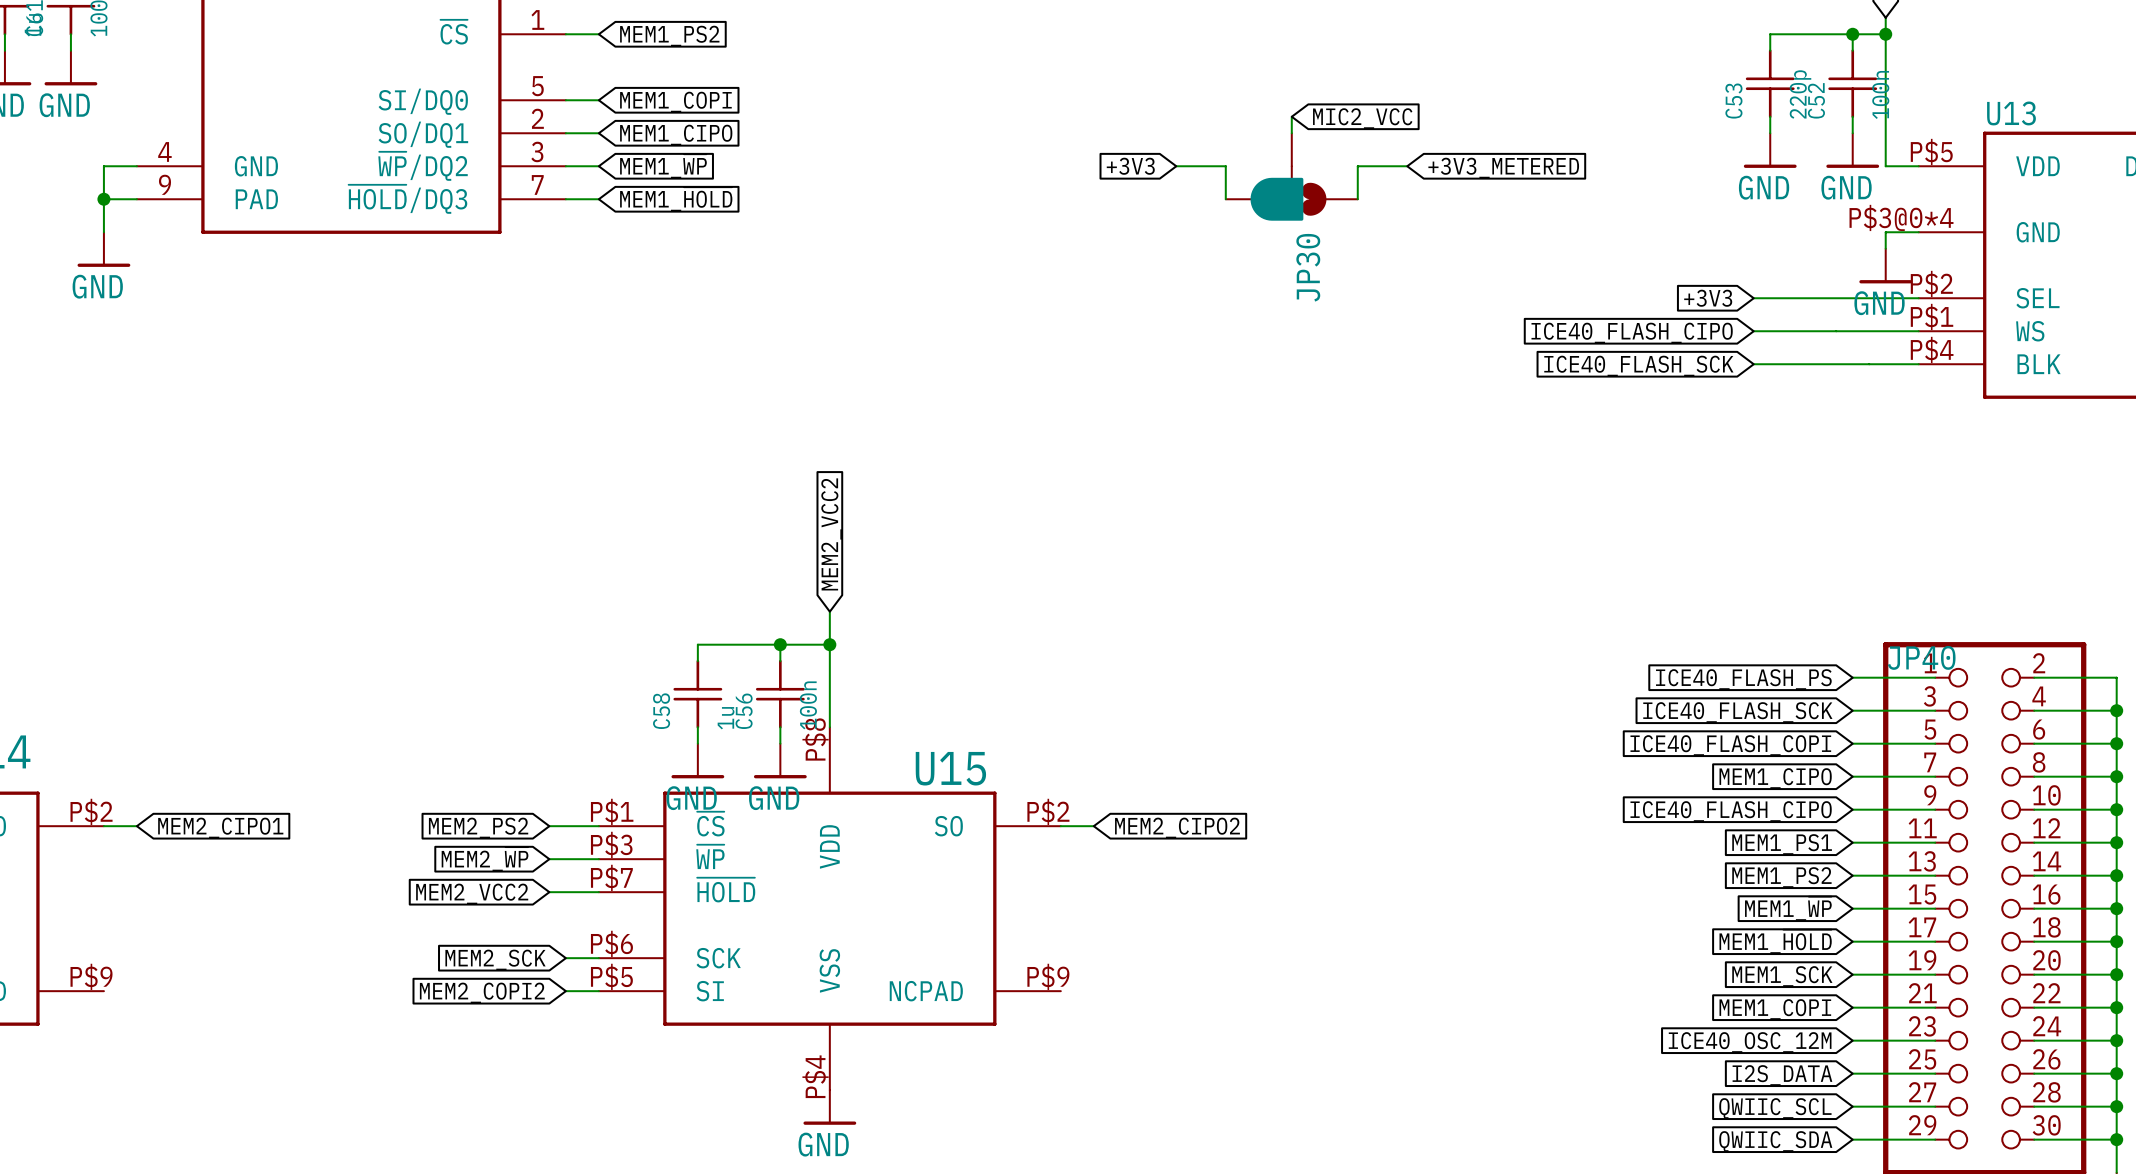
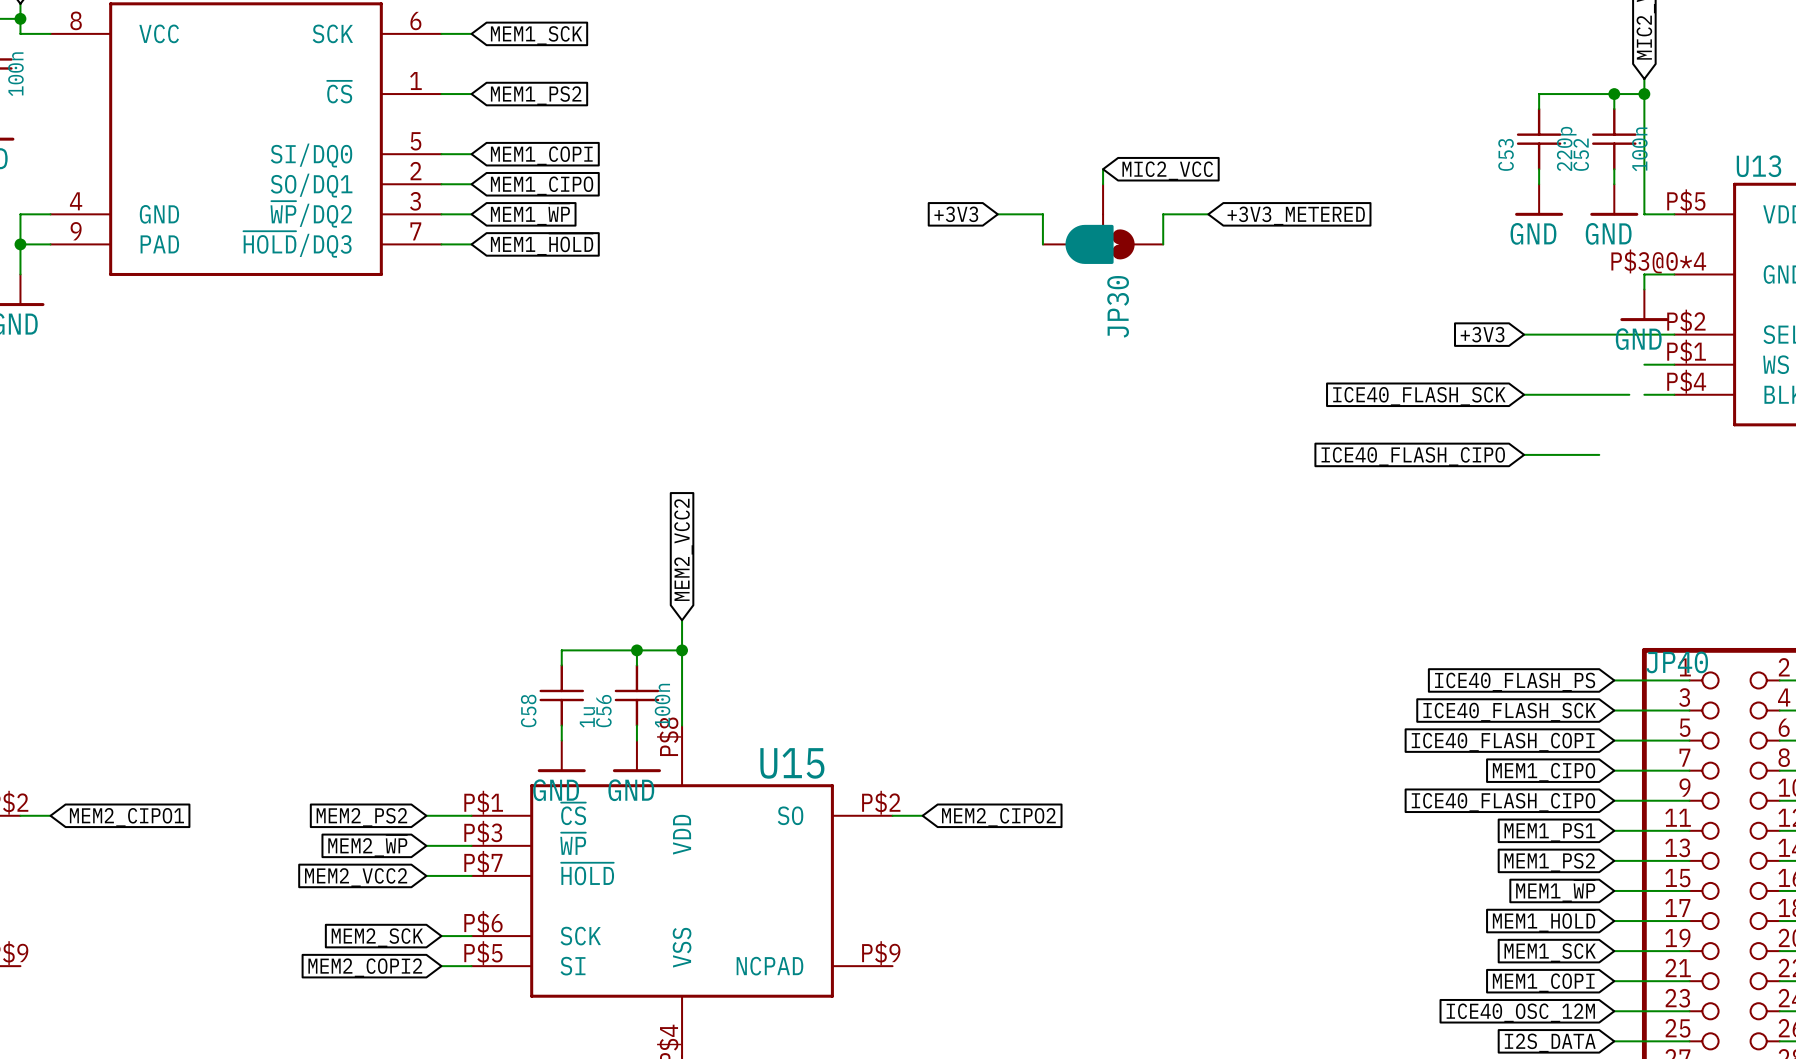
wire: (1753, 331) (1885, 331) -> none
global label position: ICE40_FLASH_CIPO (1632, 333) -> ICE40_FLASH_CIPO (1413, 456)
wire: (1869, 364) (1885, 364) -> none
wire: none -> (1524, 454) (1599, 454)

